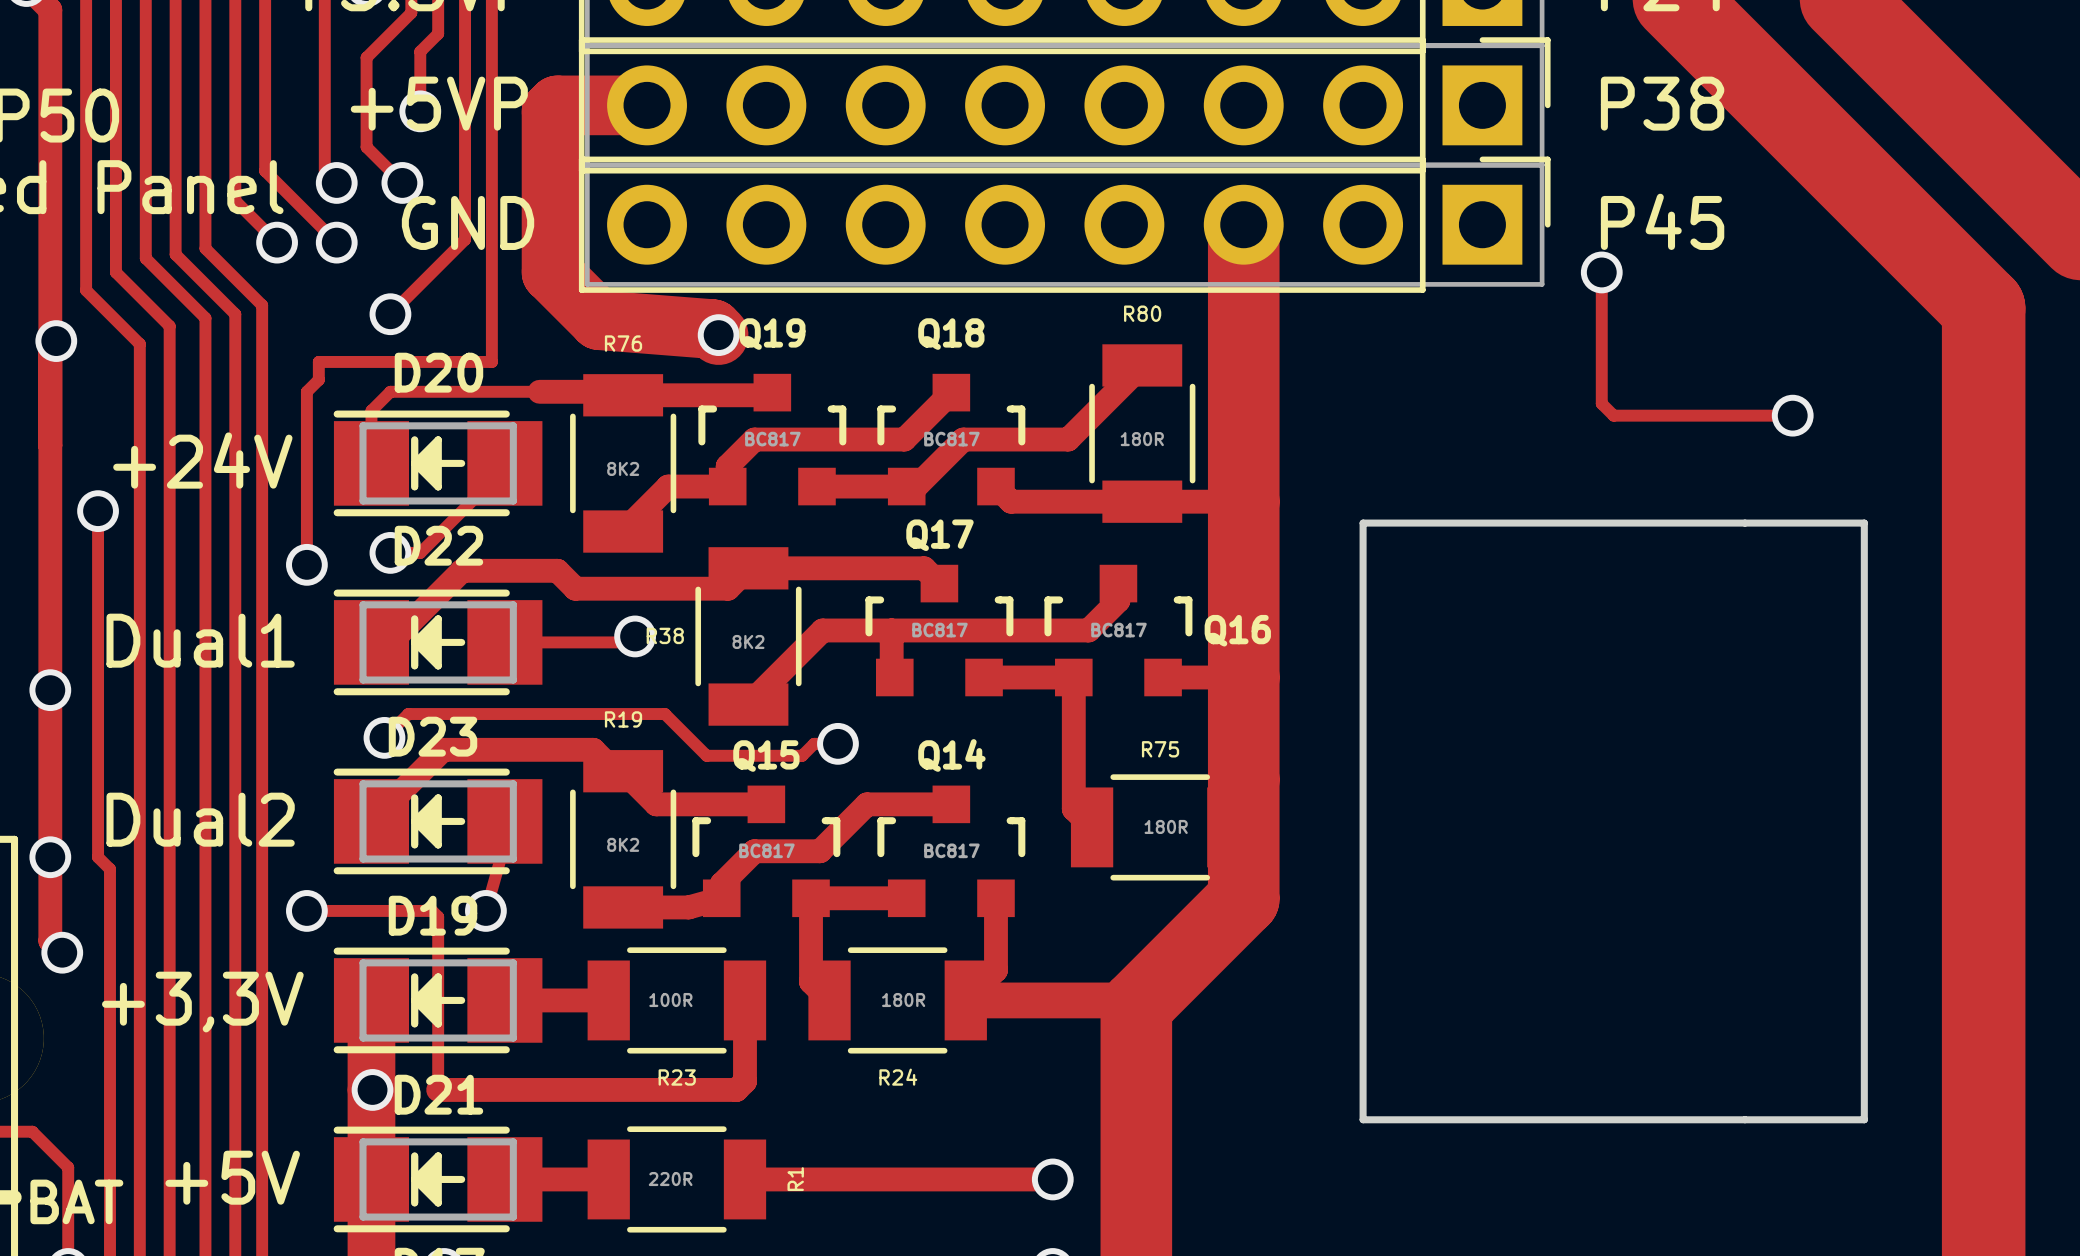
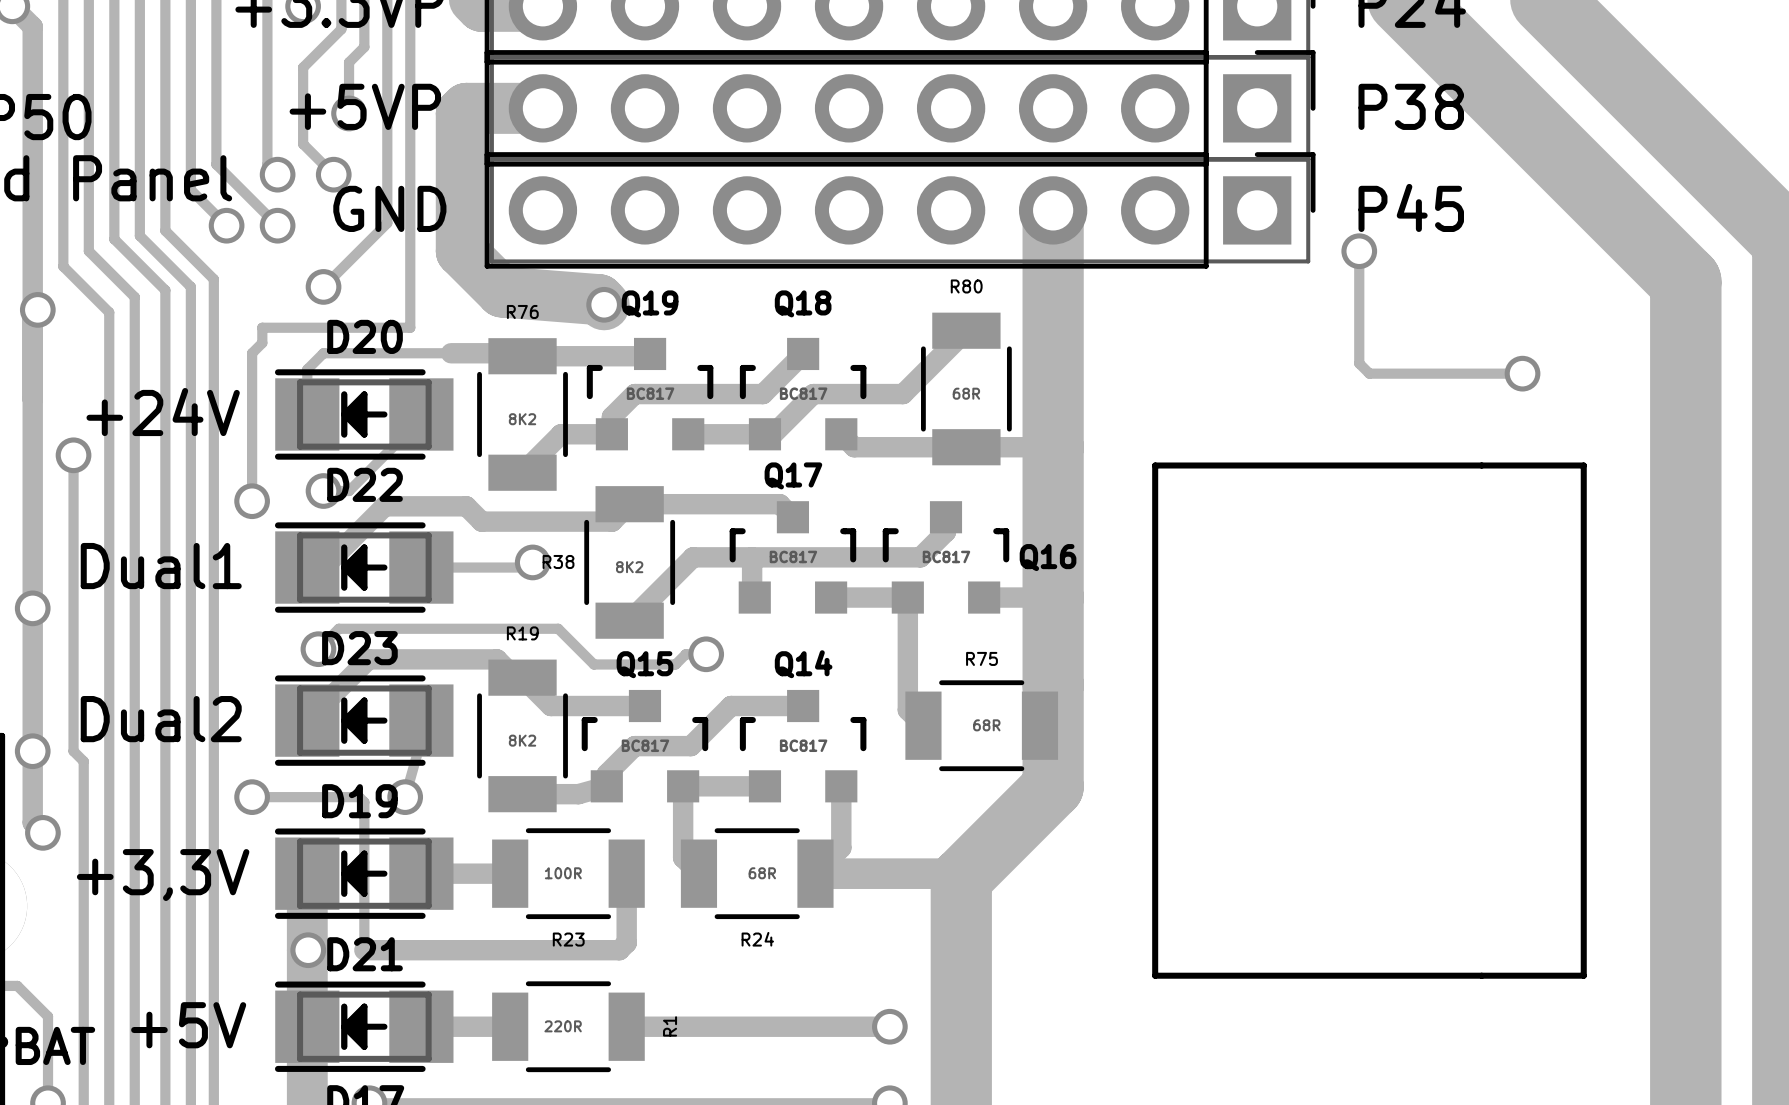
R80 value: 180R (1142, 439) -> 68R (966, 393)
R75 value: 180R (1166, 826) -> 68R (986, 725)
R24 value: 180R (903, 1000) -> 68R (762, 873)

